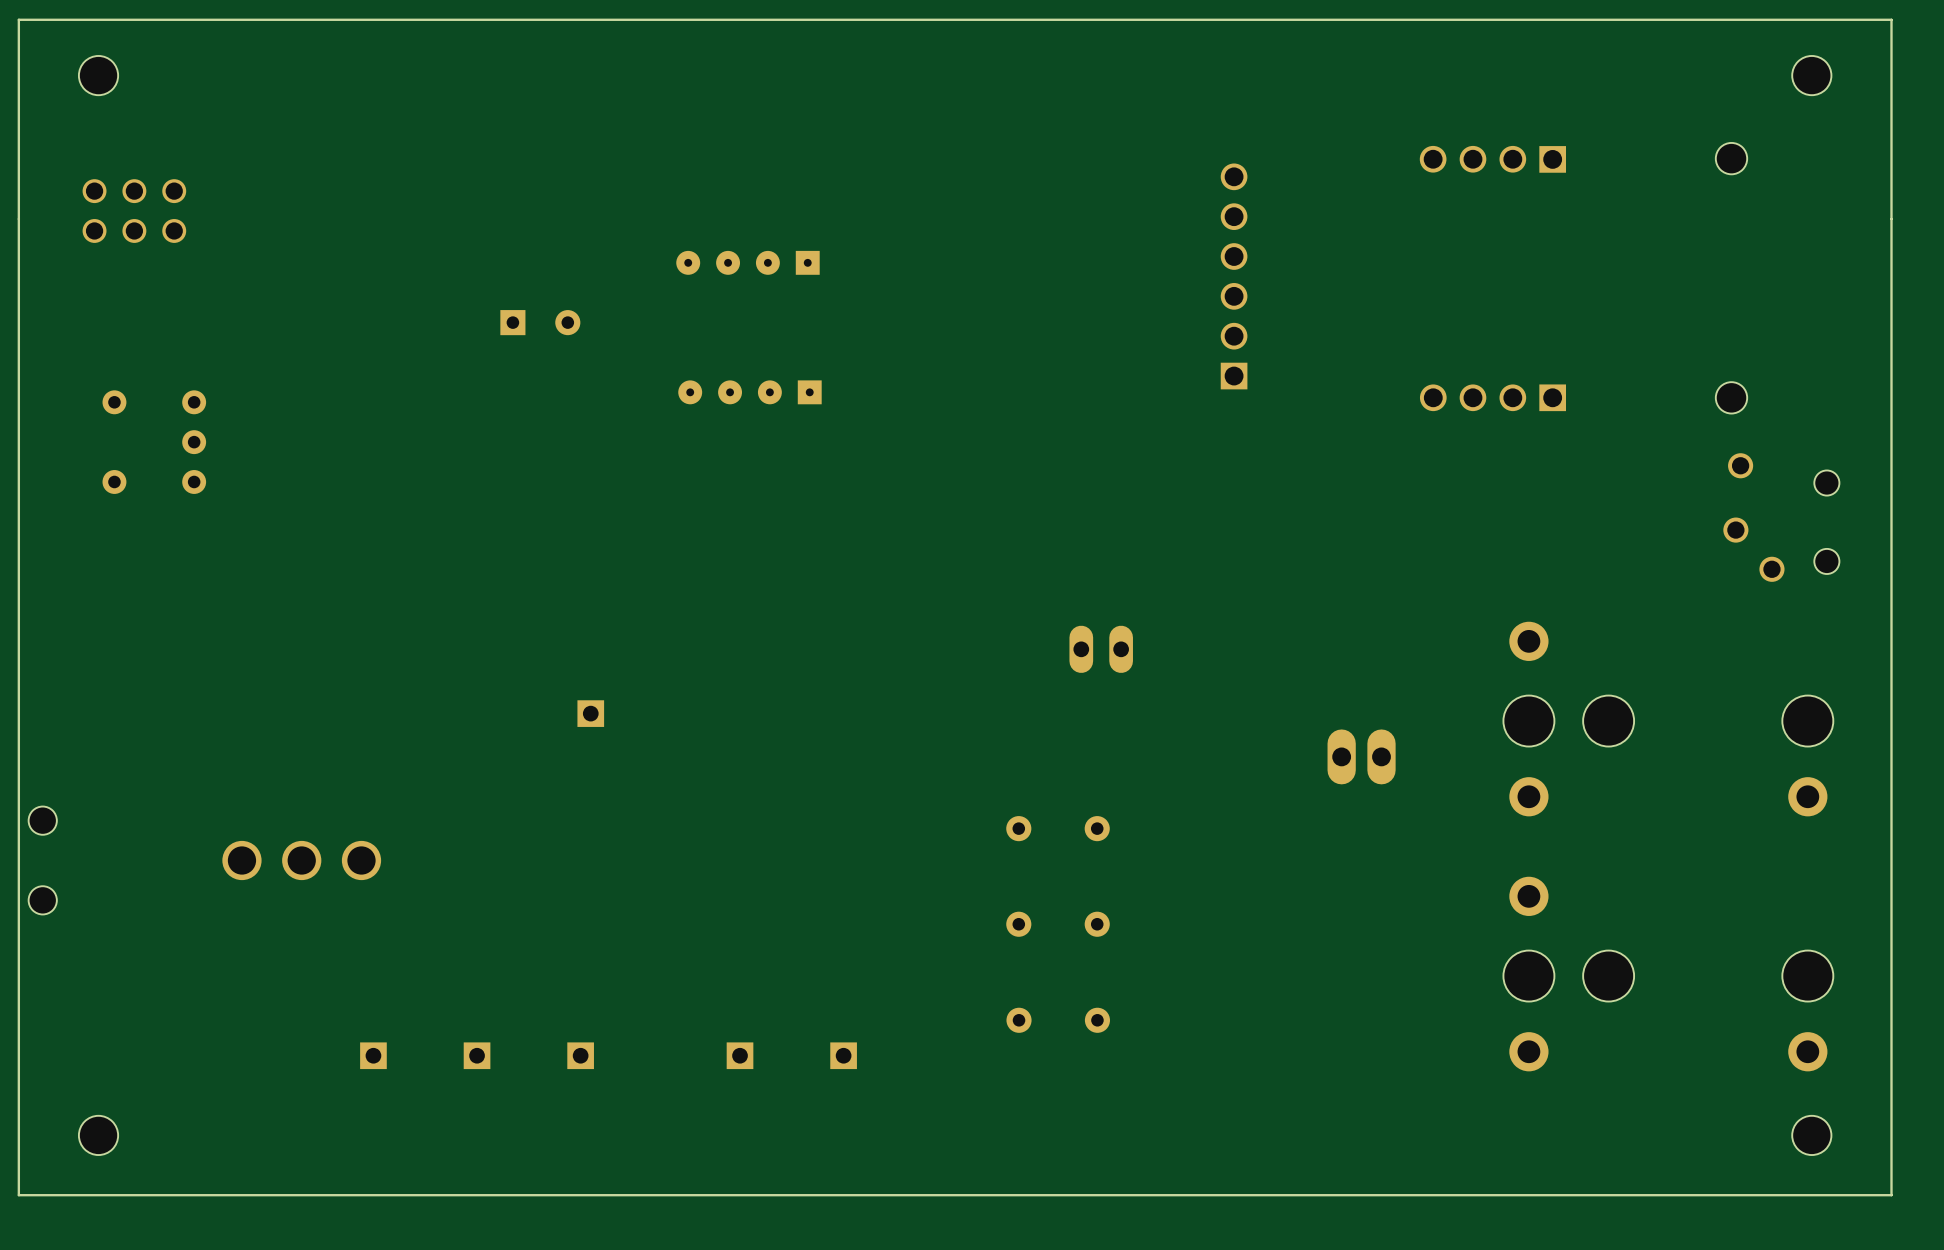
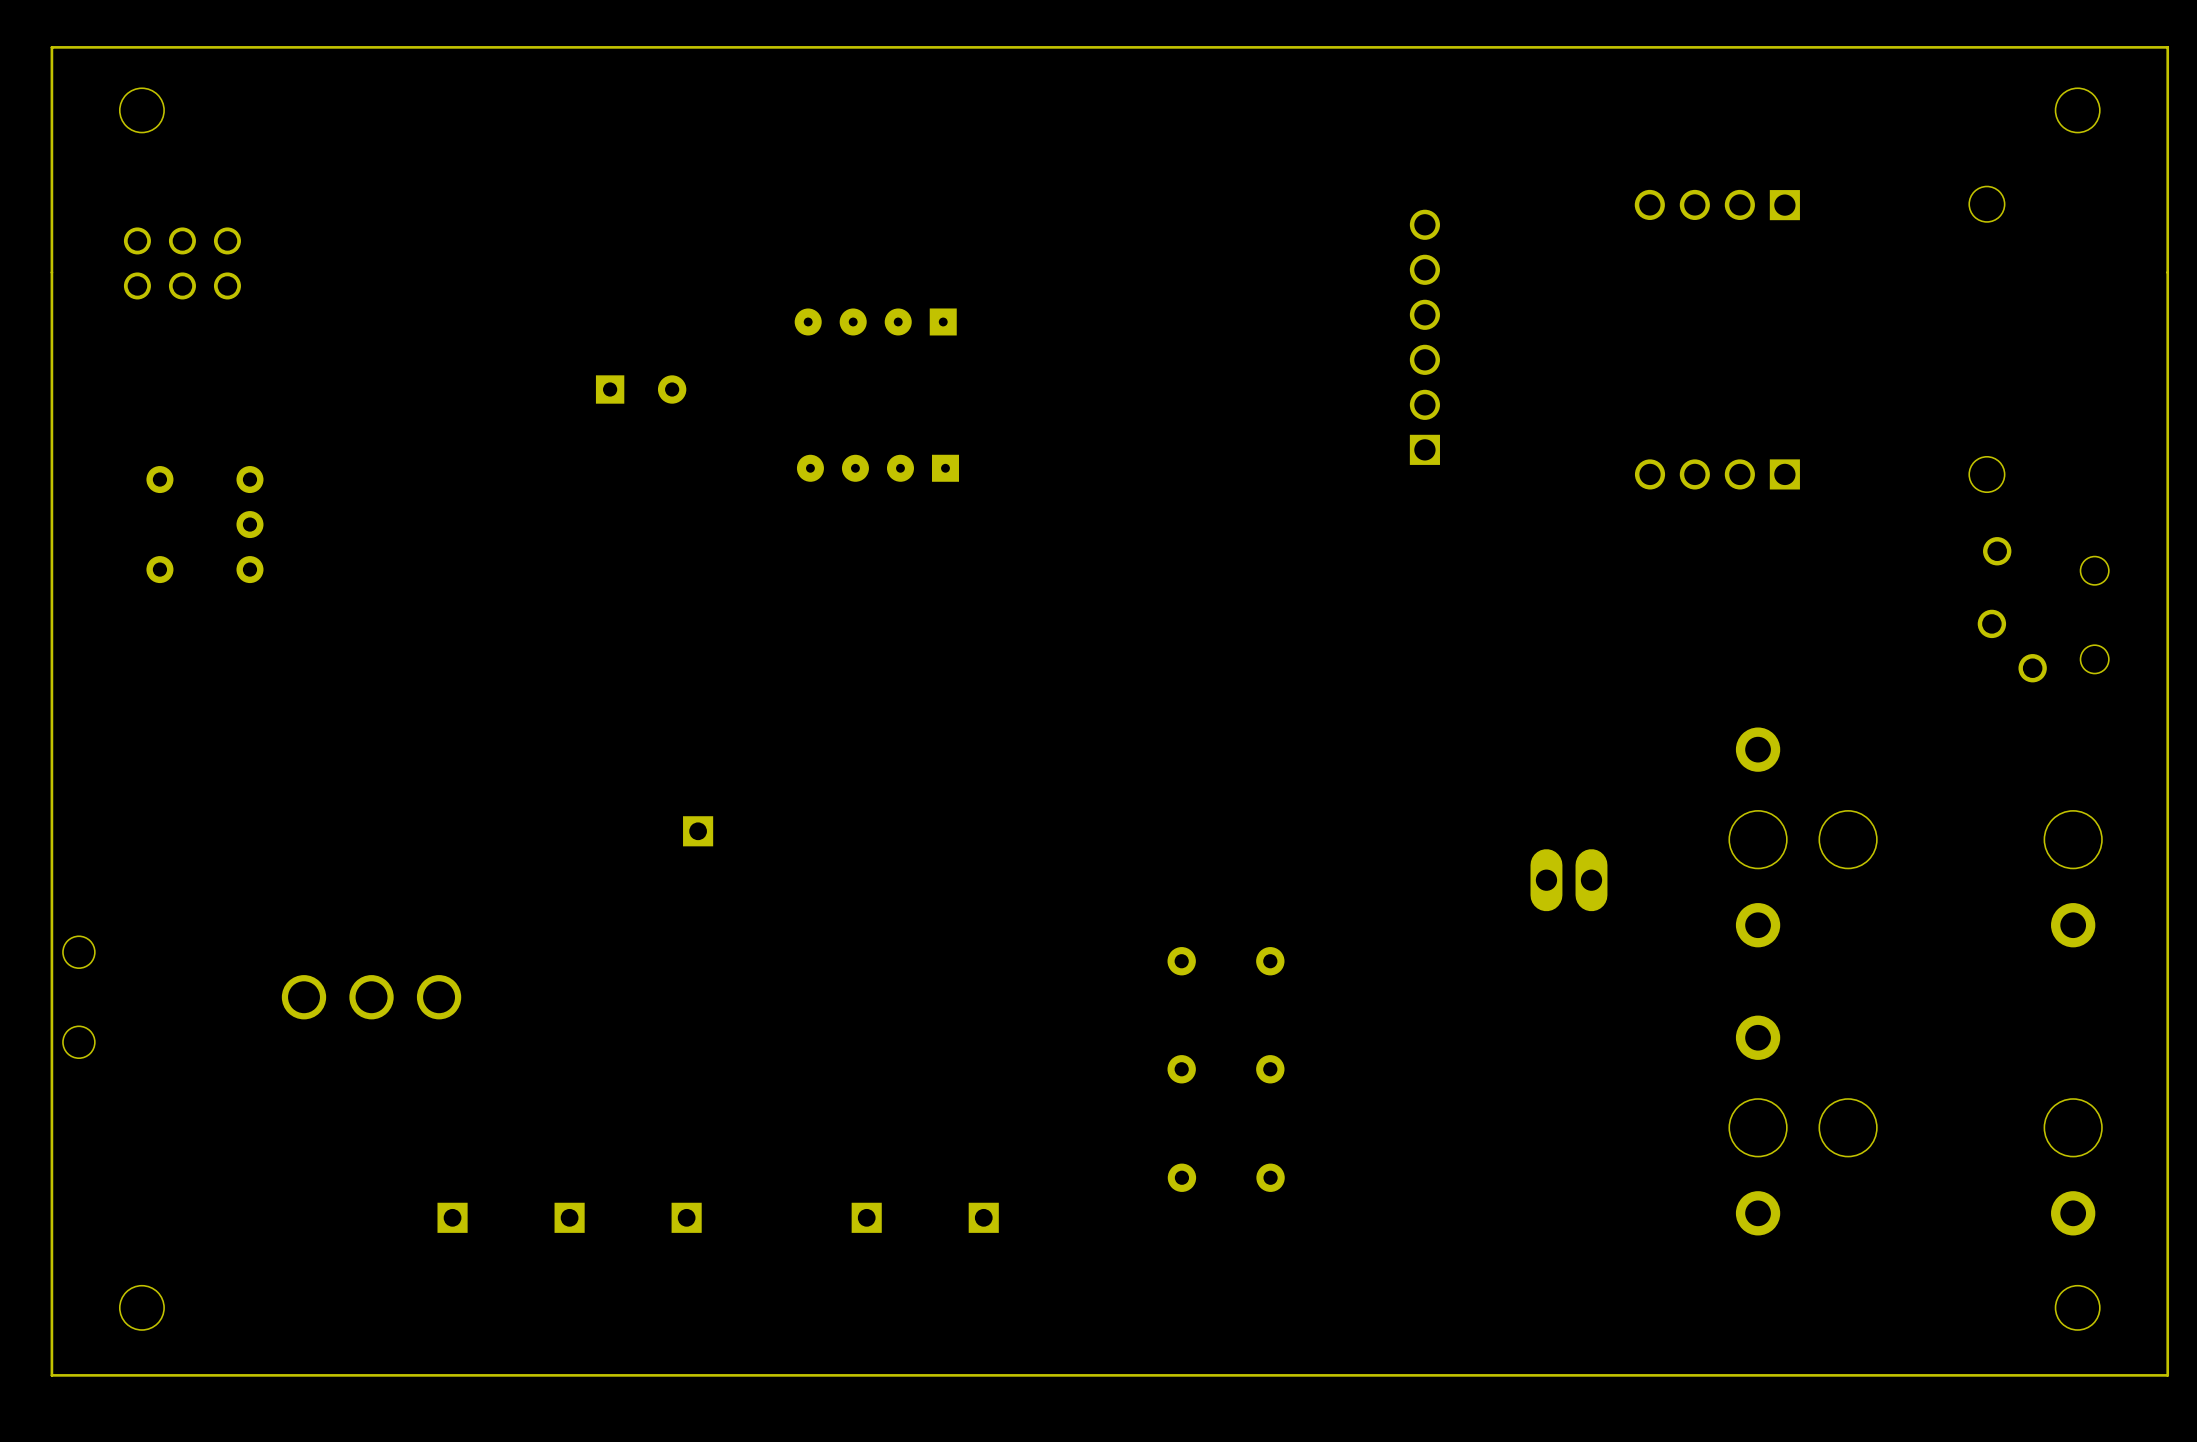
part: (1101, 649) -> none

